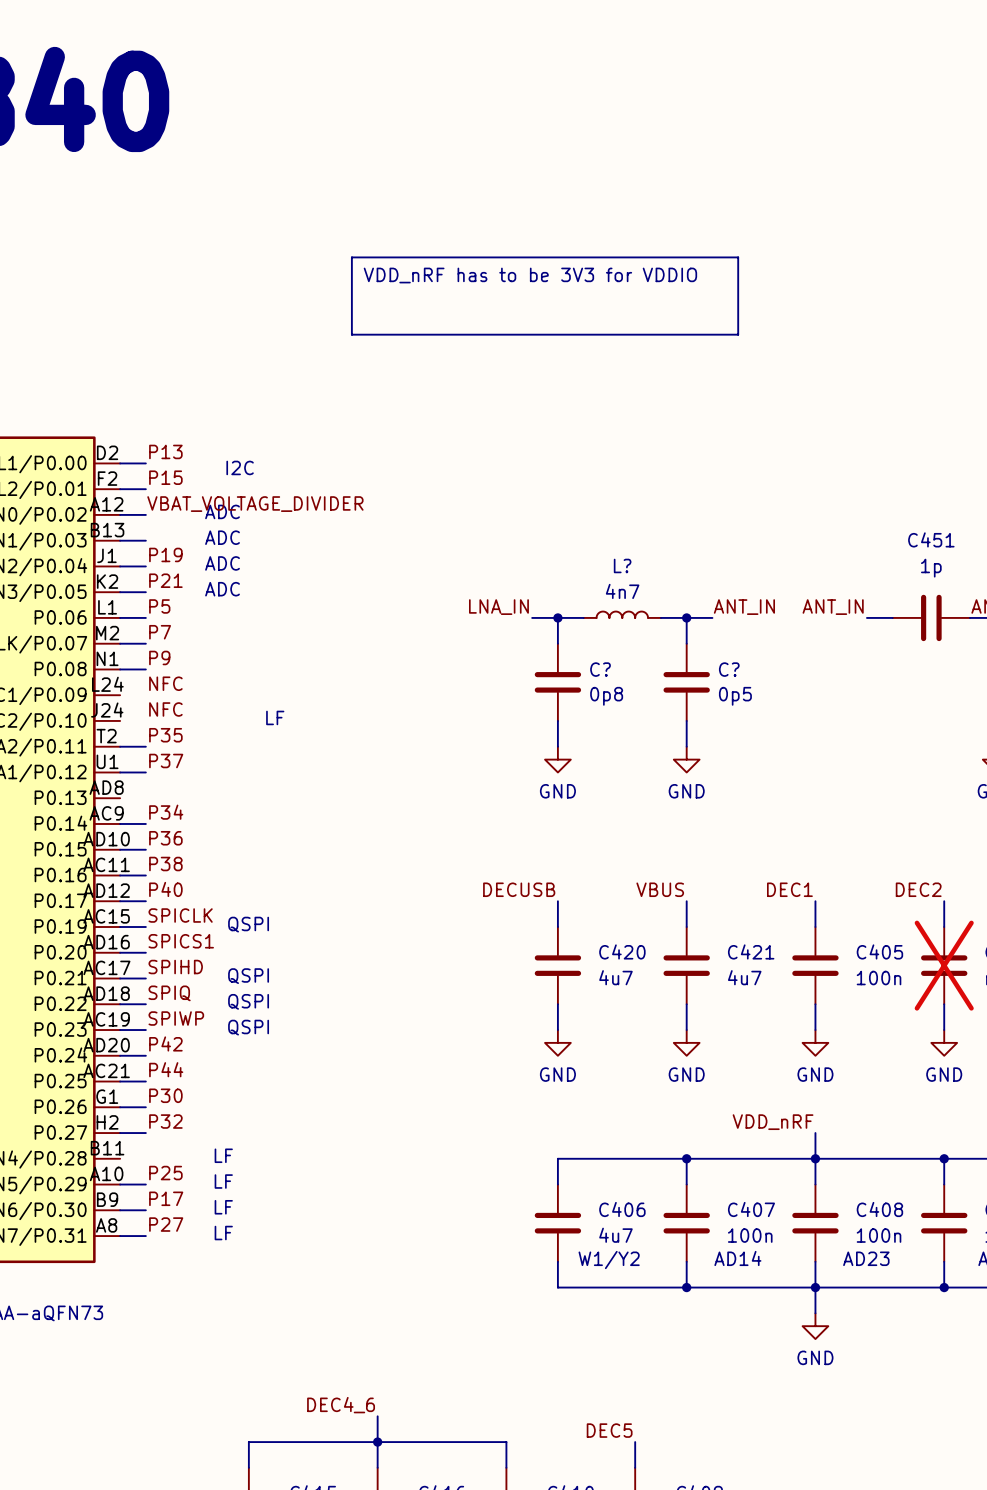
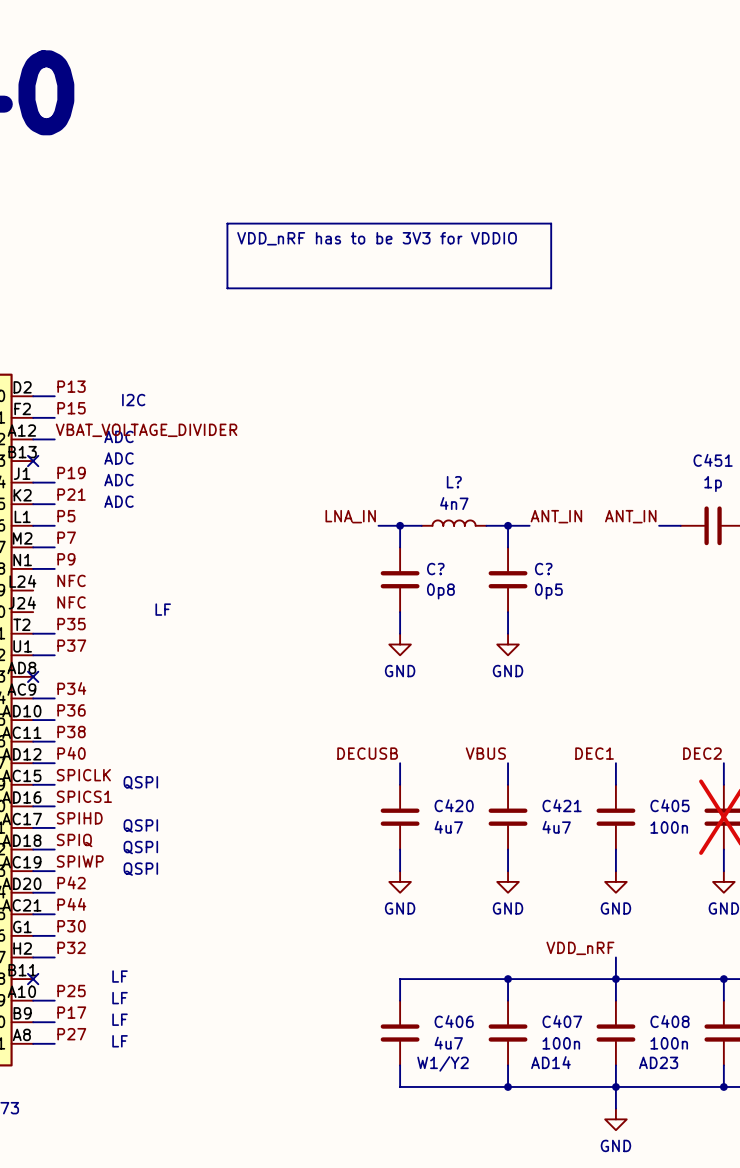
wire: (120, 540) (145, 540) -> none
no-connect mark: none -> (33, 461)
no-connect mark: none -> (33, 676)
no-connect mark: none -> (33, 979)

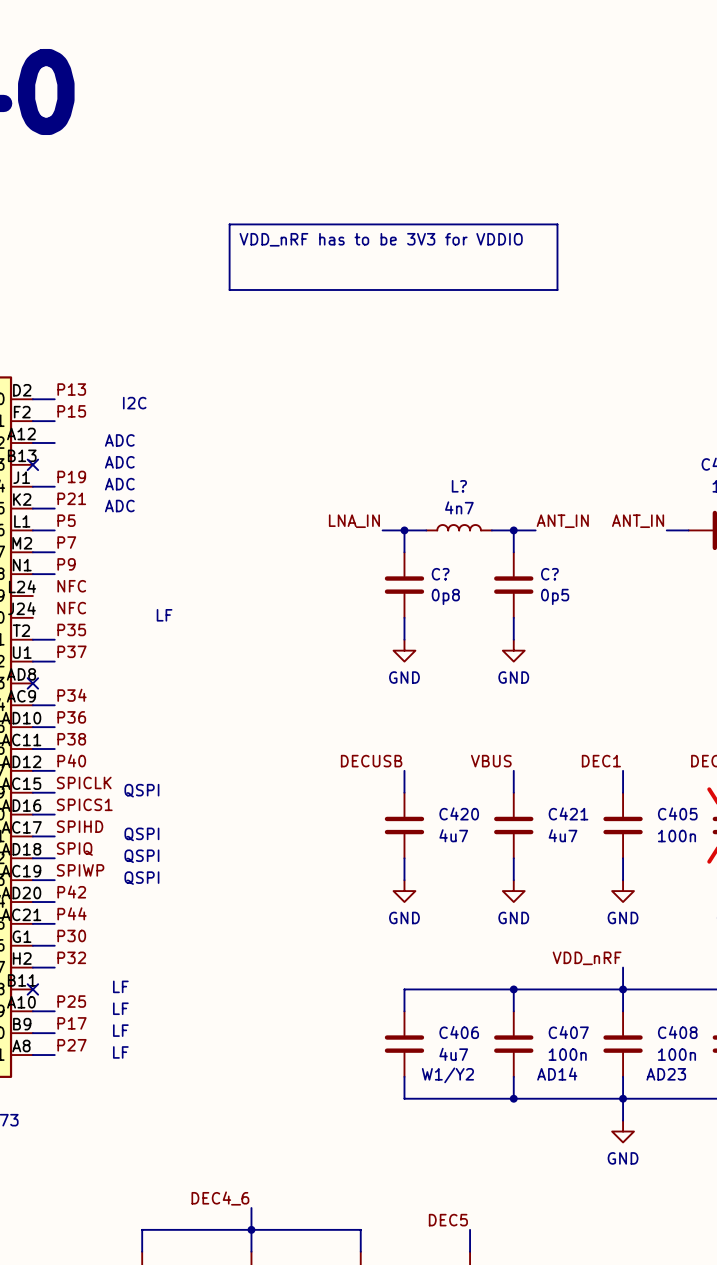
label: VBAT_VOLTAGE_DIVIDER (146, 430) -> none

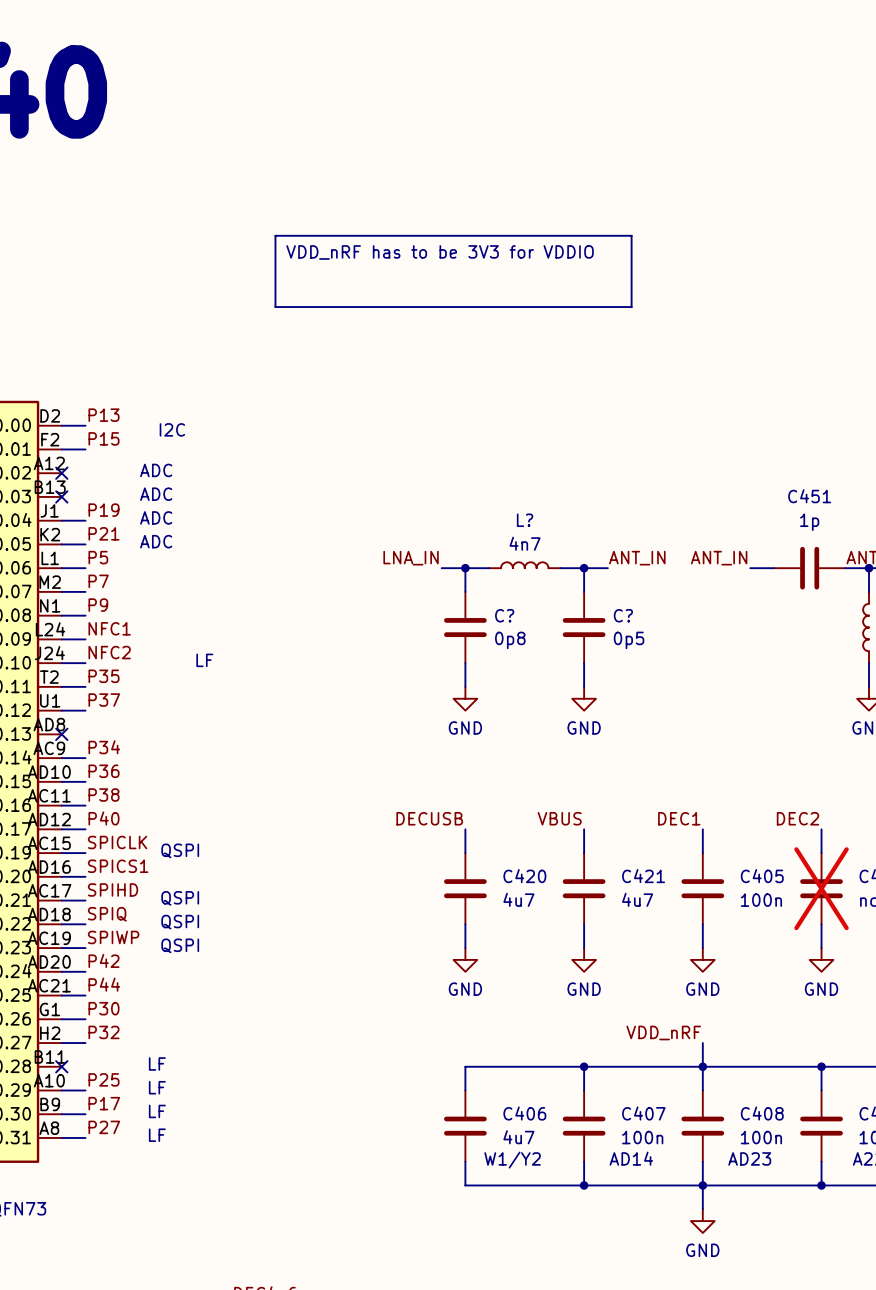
wire: (32, 443) (54, 443) -> (61, 639) (85, 639)
no-connect mark: none -> (61, 473)
label: NFC (71, 586) -> NFC1 (109, 628)
label: NFC (71, 608) -> NFC2 (109, 652)
wire: none -> (61, 663) (85, 663)

